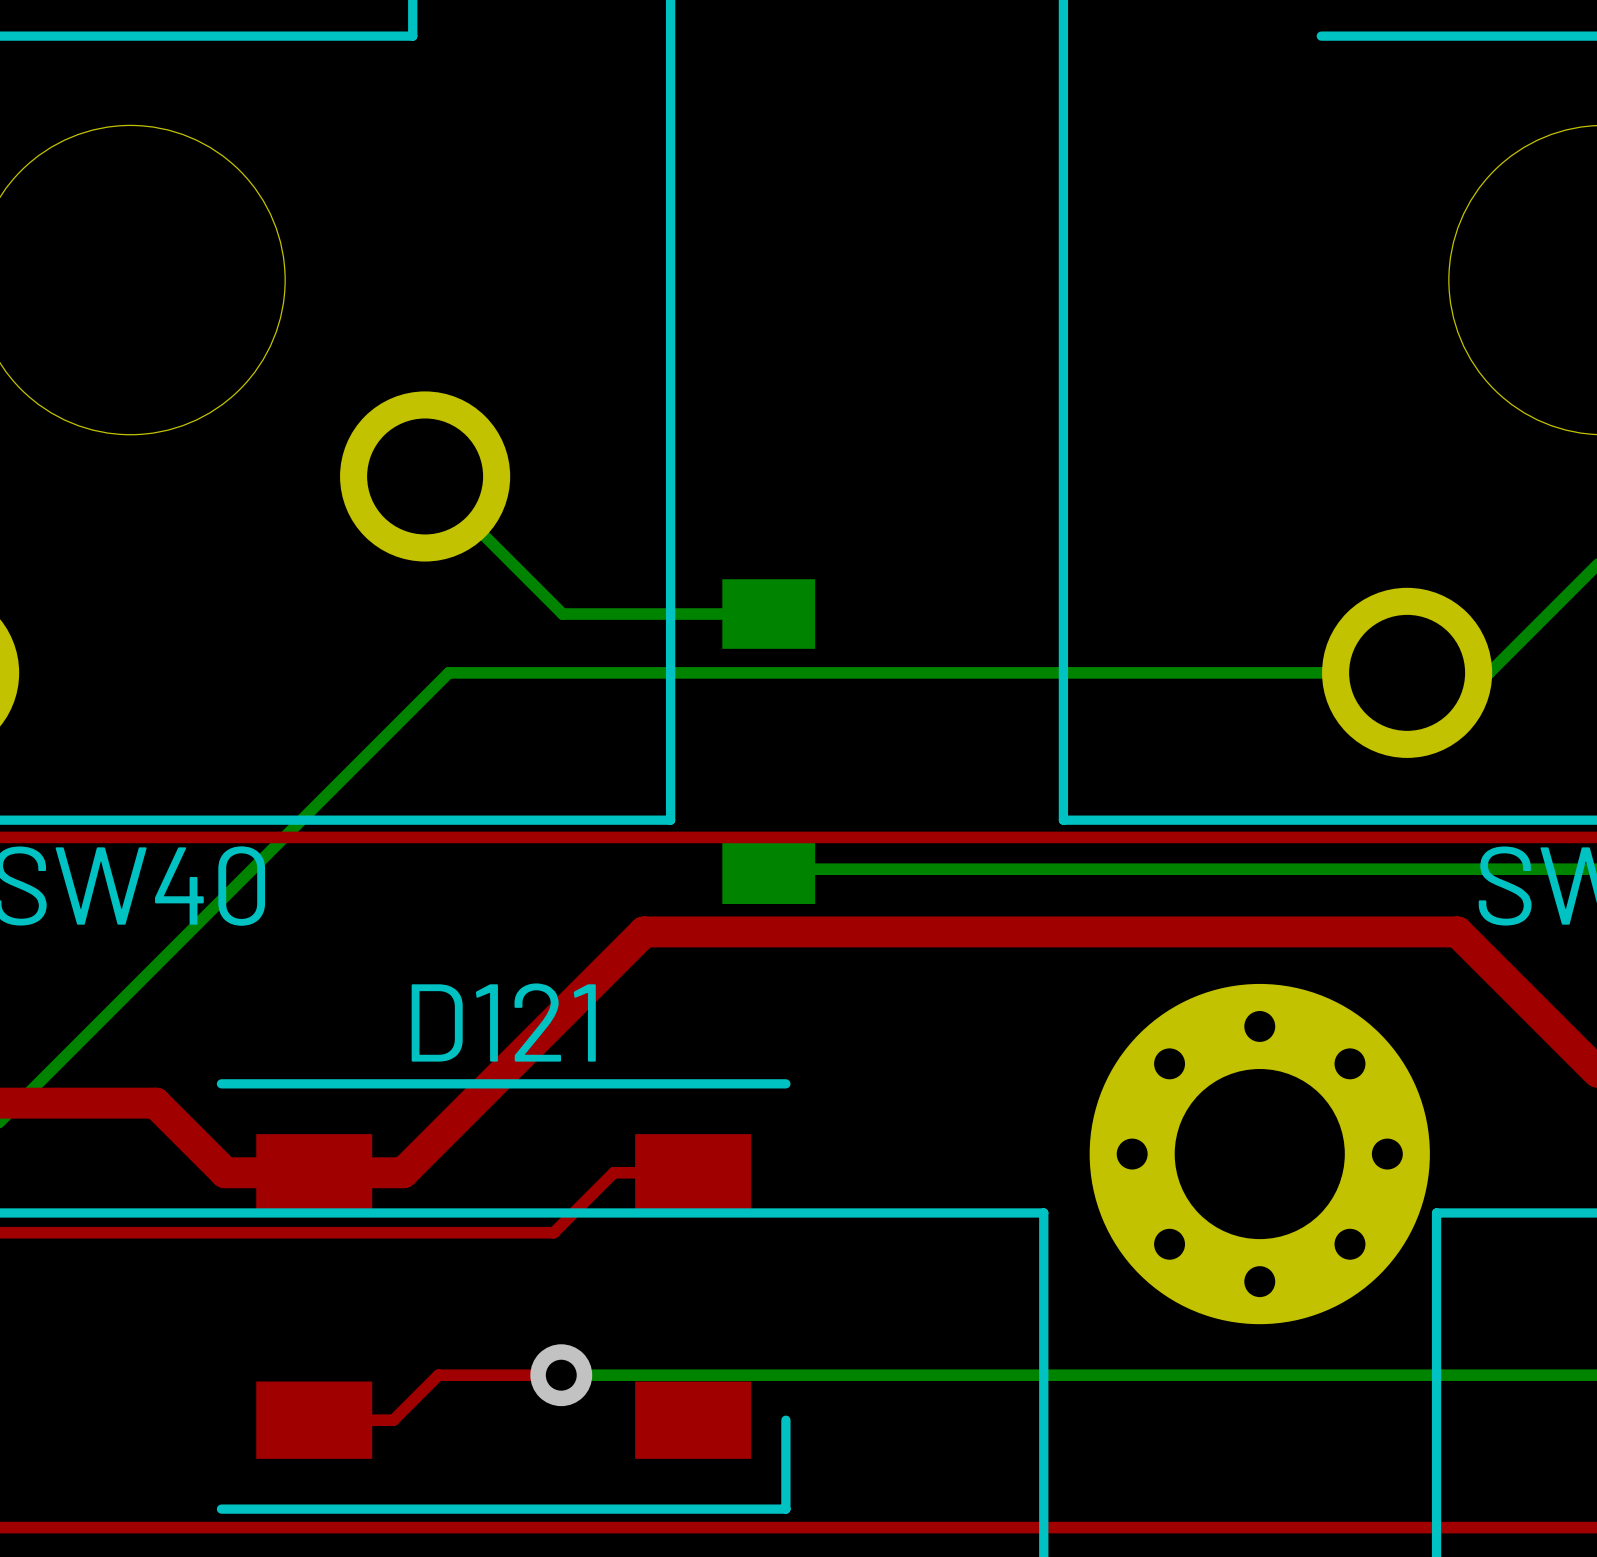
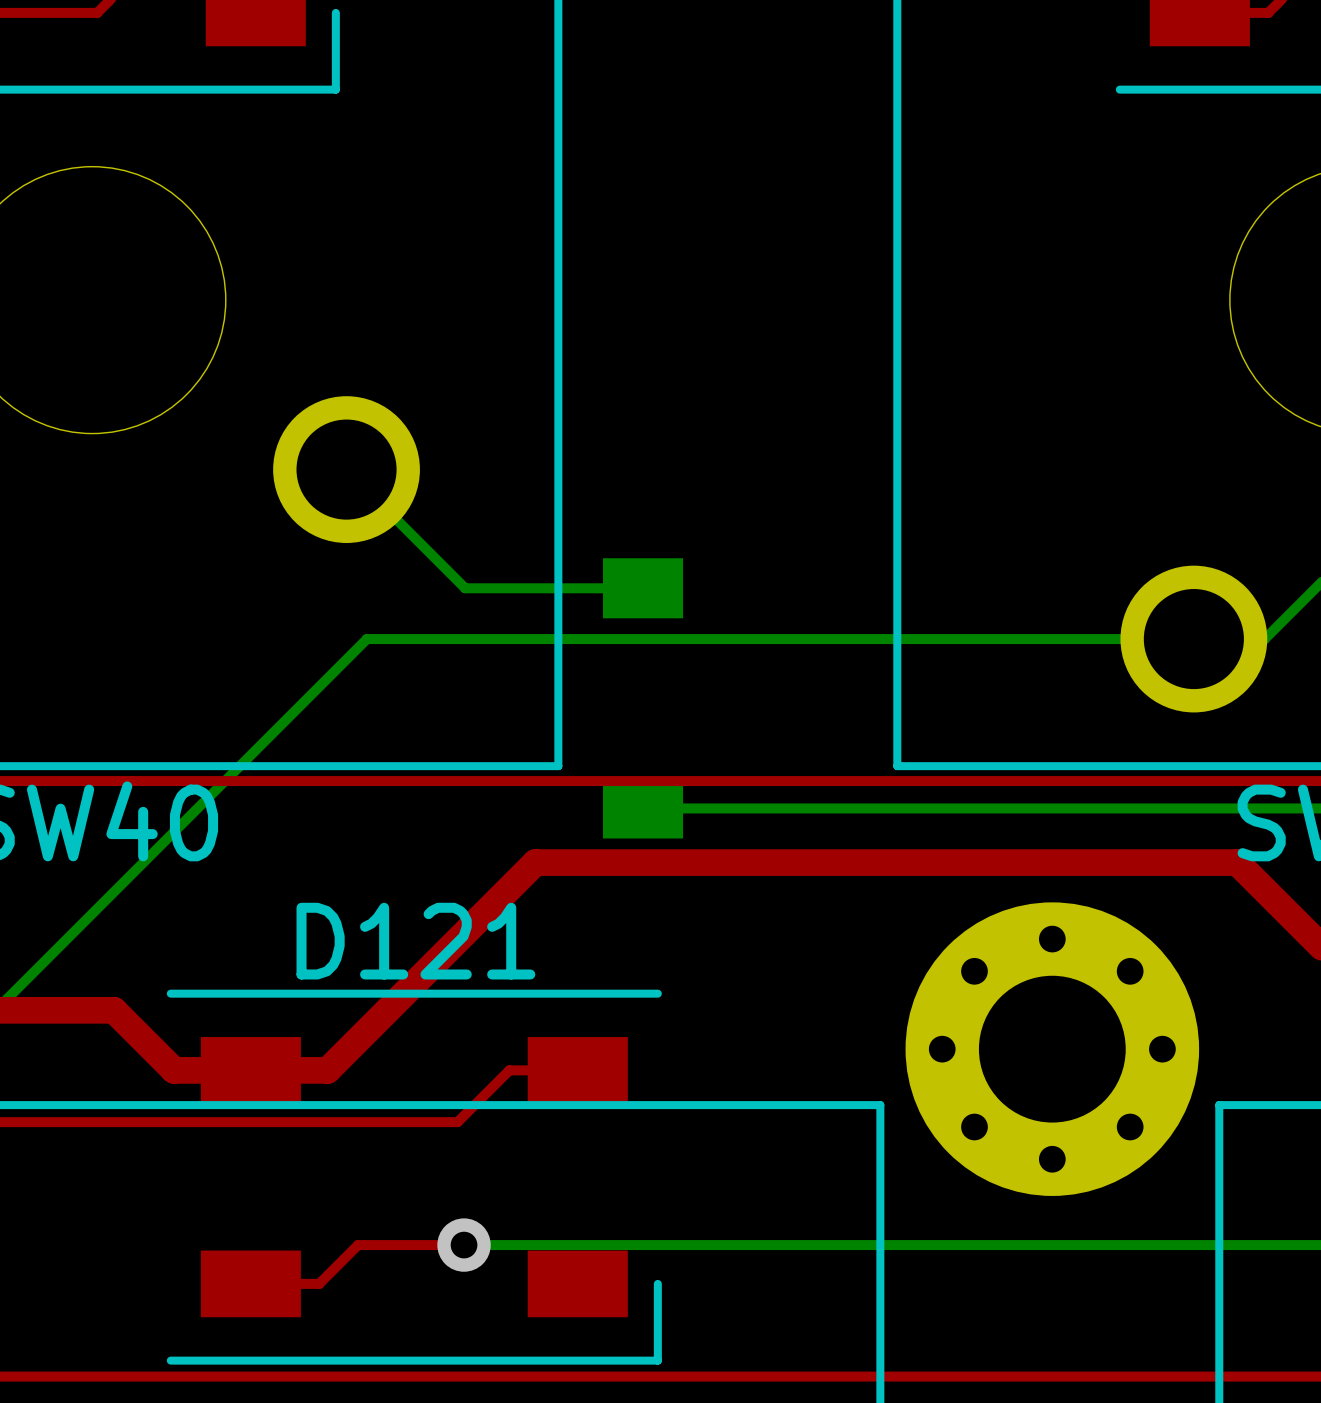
part position: (1259, 1154) -> (1052, 1049)

